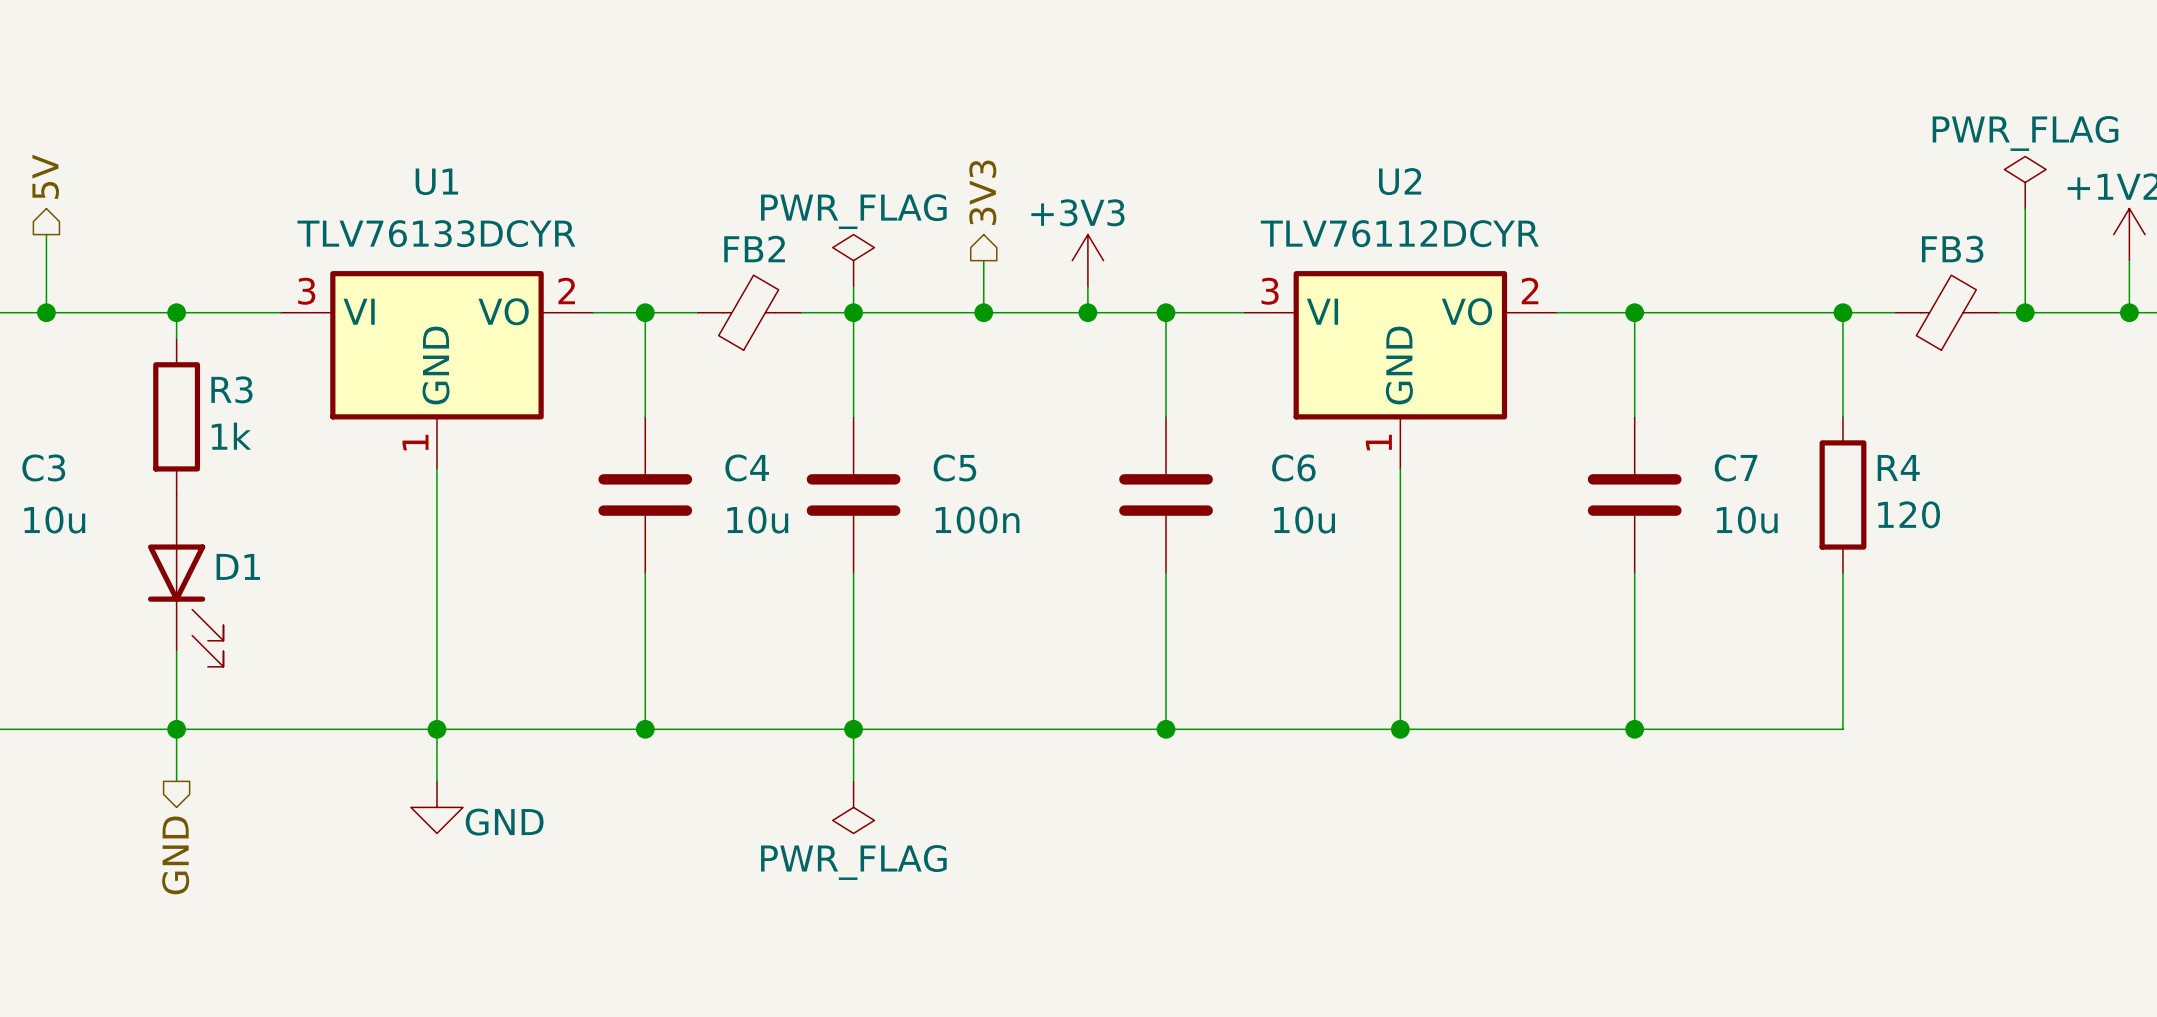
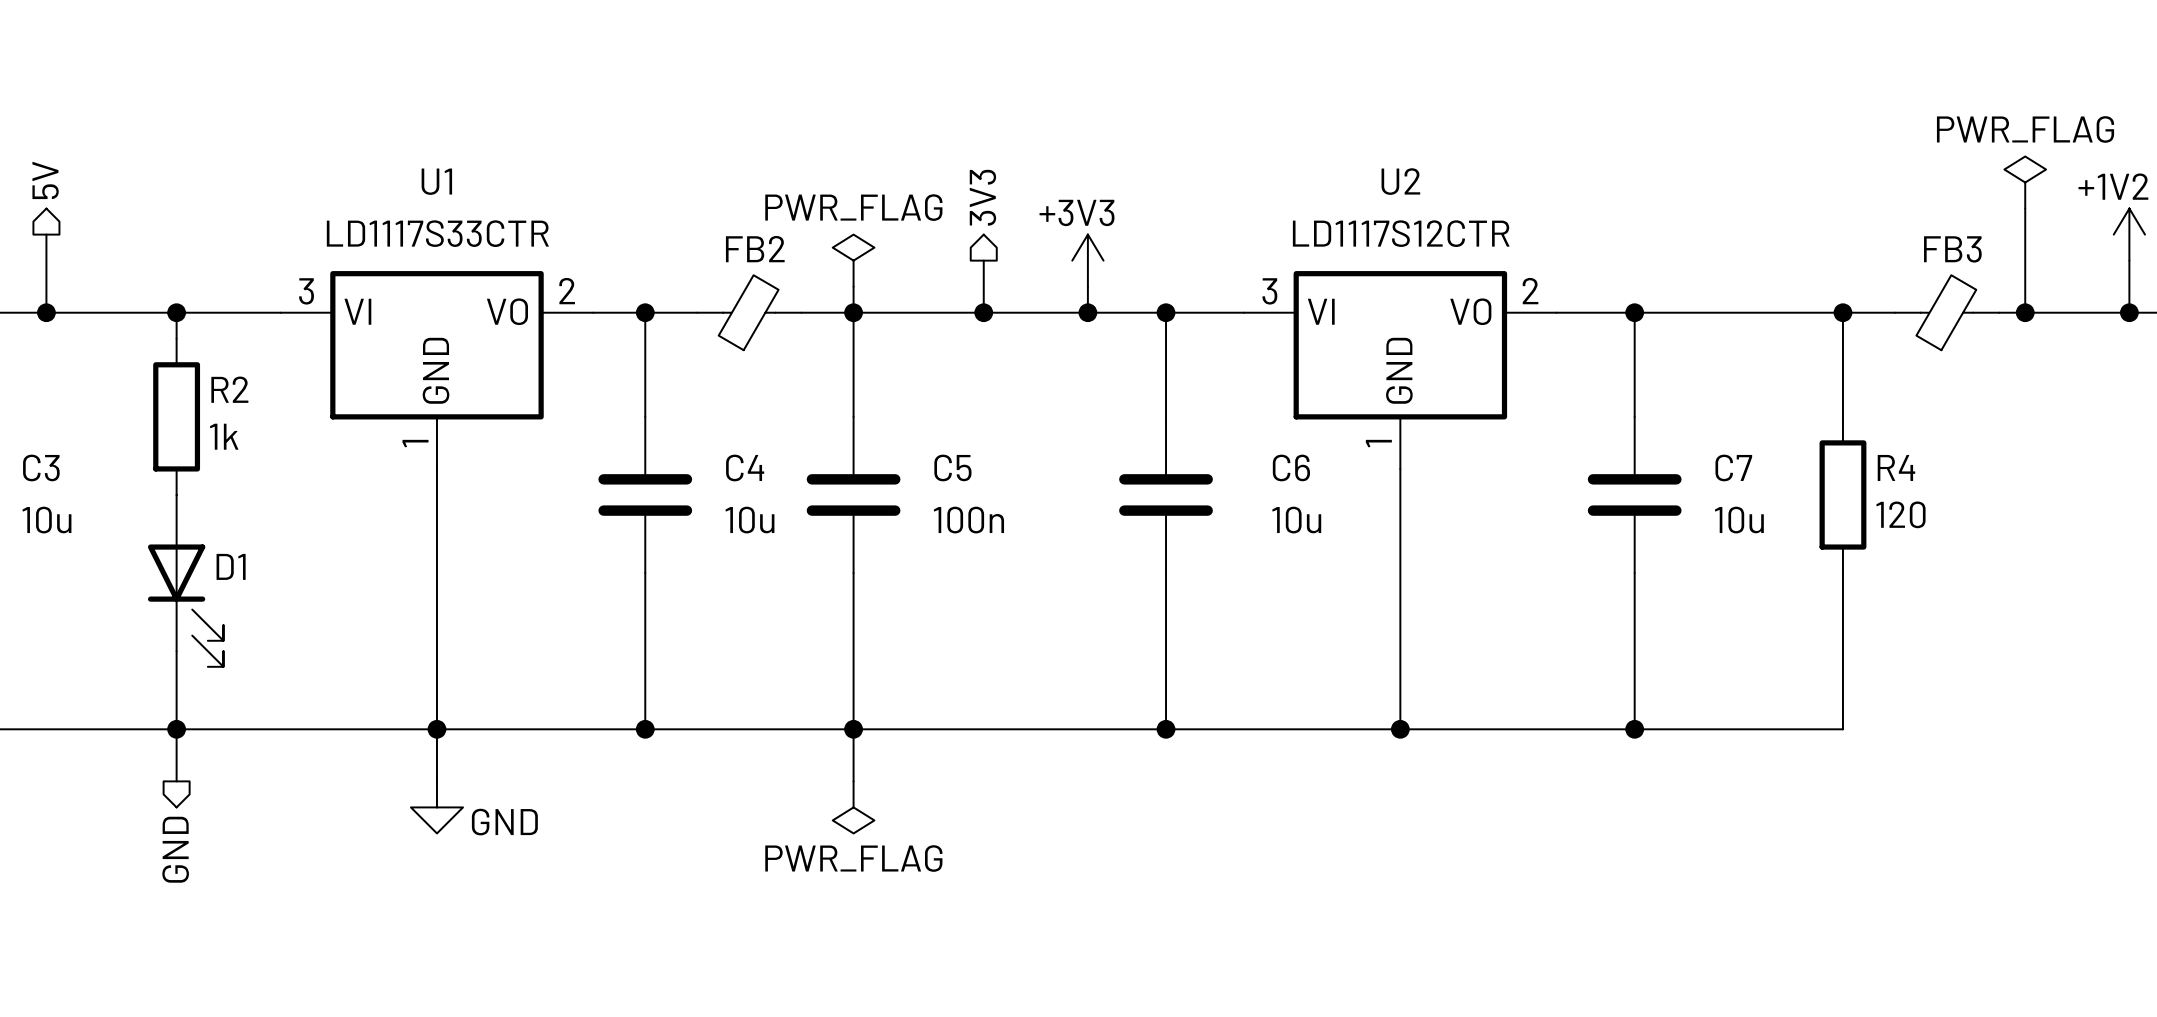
U1 value: TLV76133DCYR (436, 233) -> LD1117S33CTR (437, 233)
U2 value: TLV76112DCYR (1399, 233) -> LD1117S12CTR (1401, 233)
R3 name: R3 (231, 389) -> R2 (229, 389)

